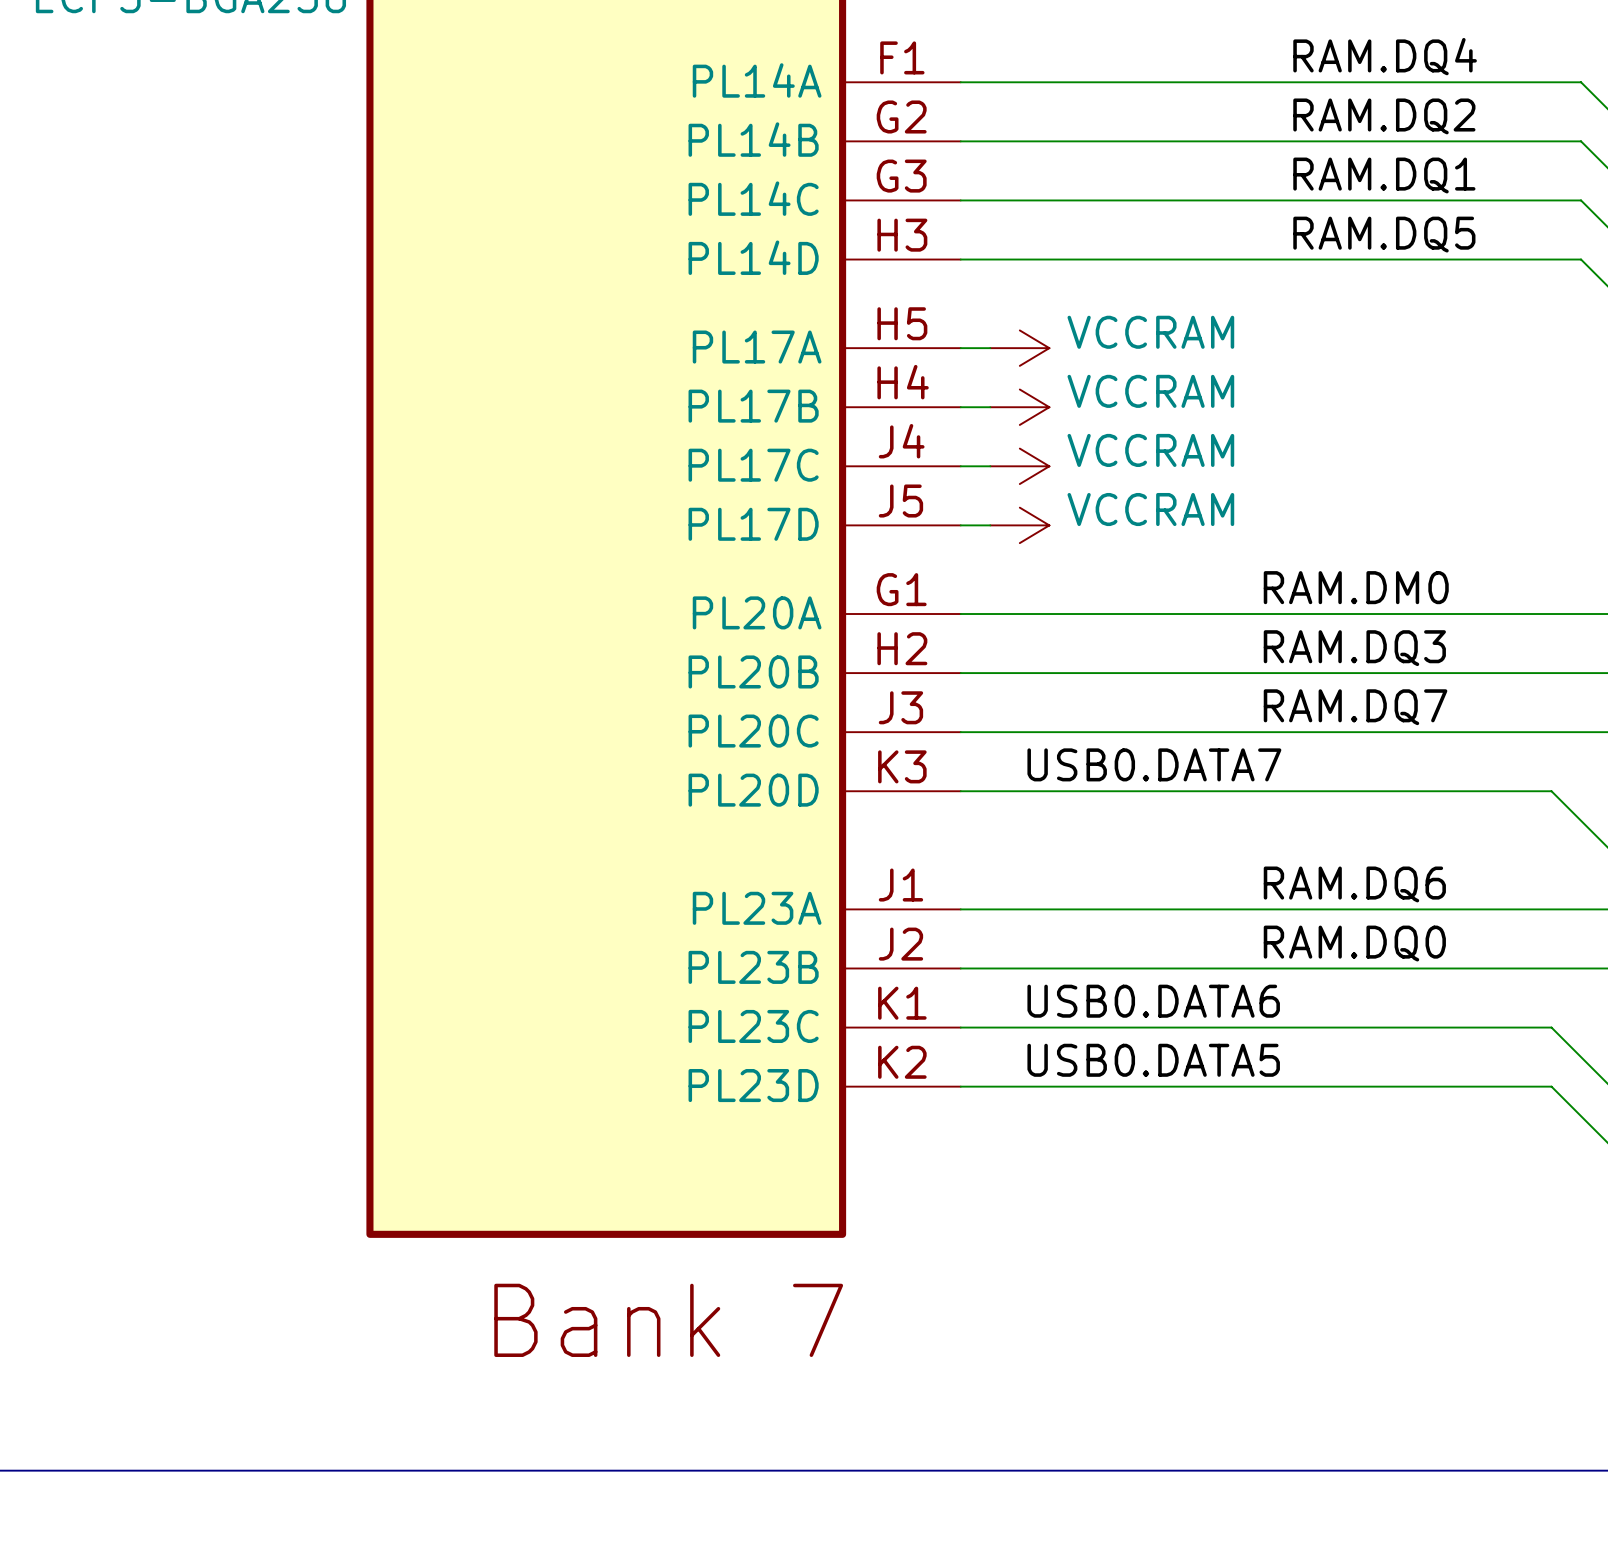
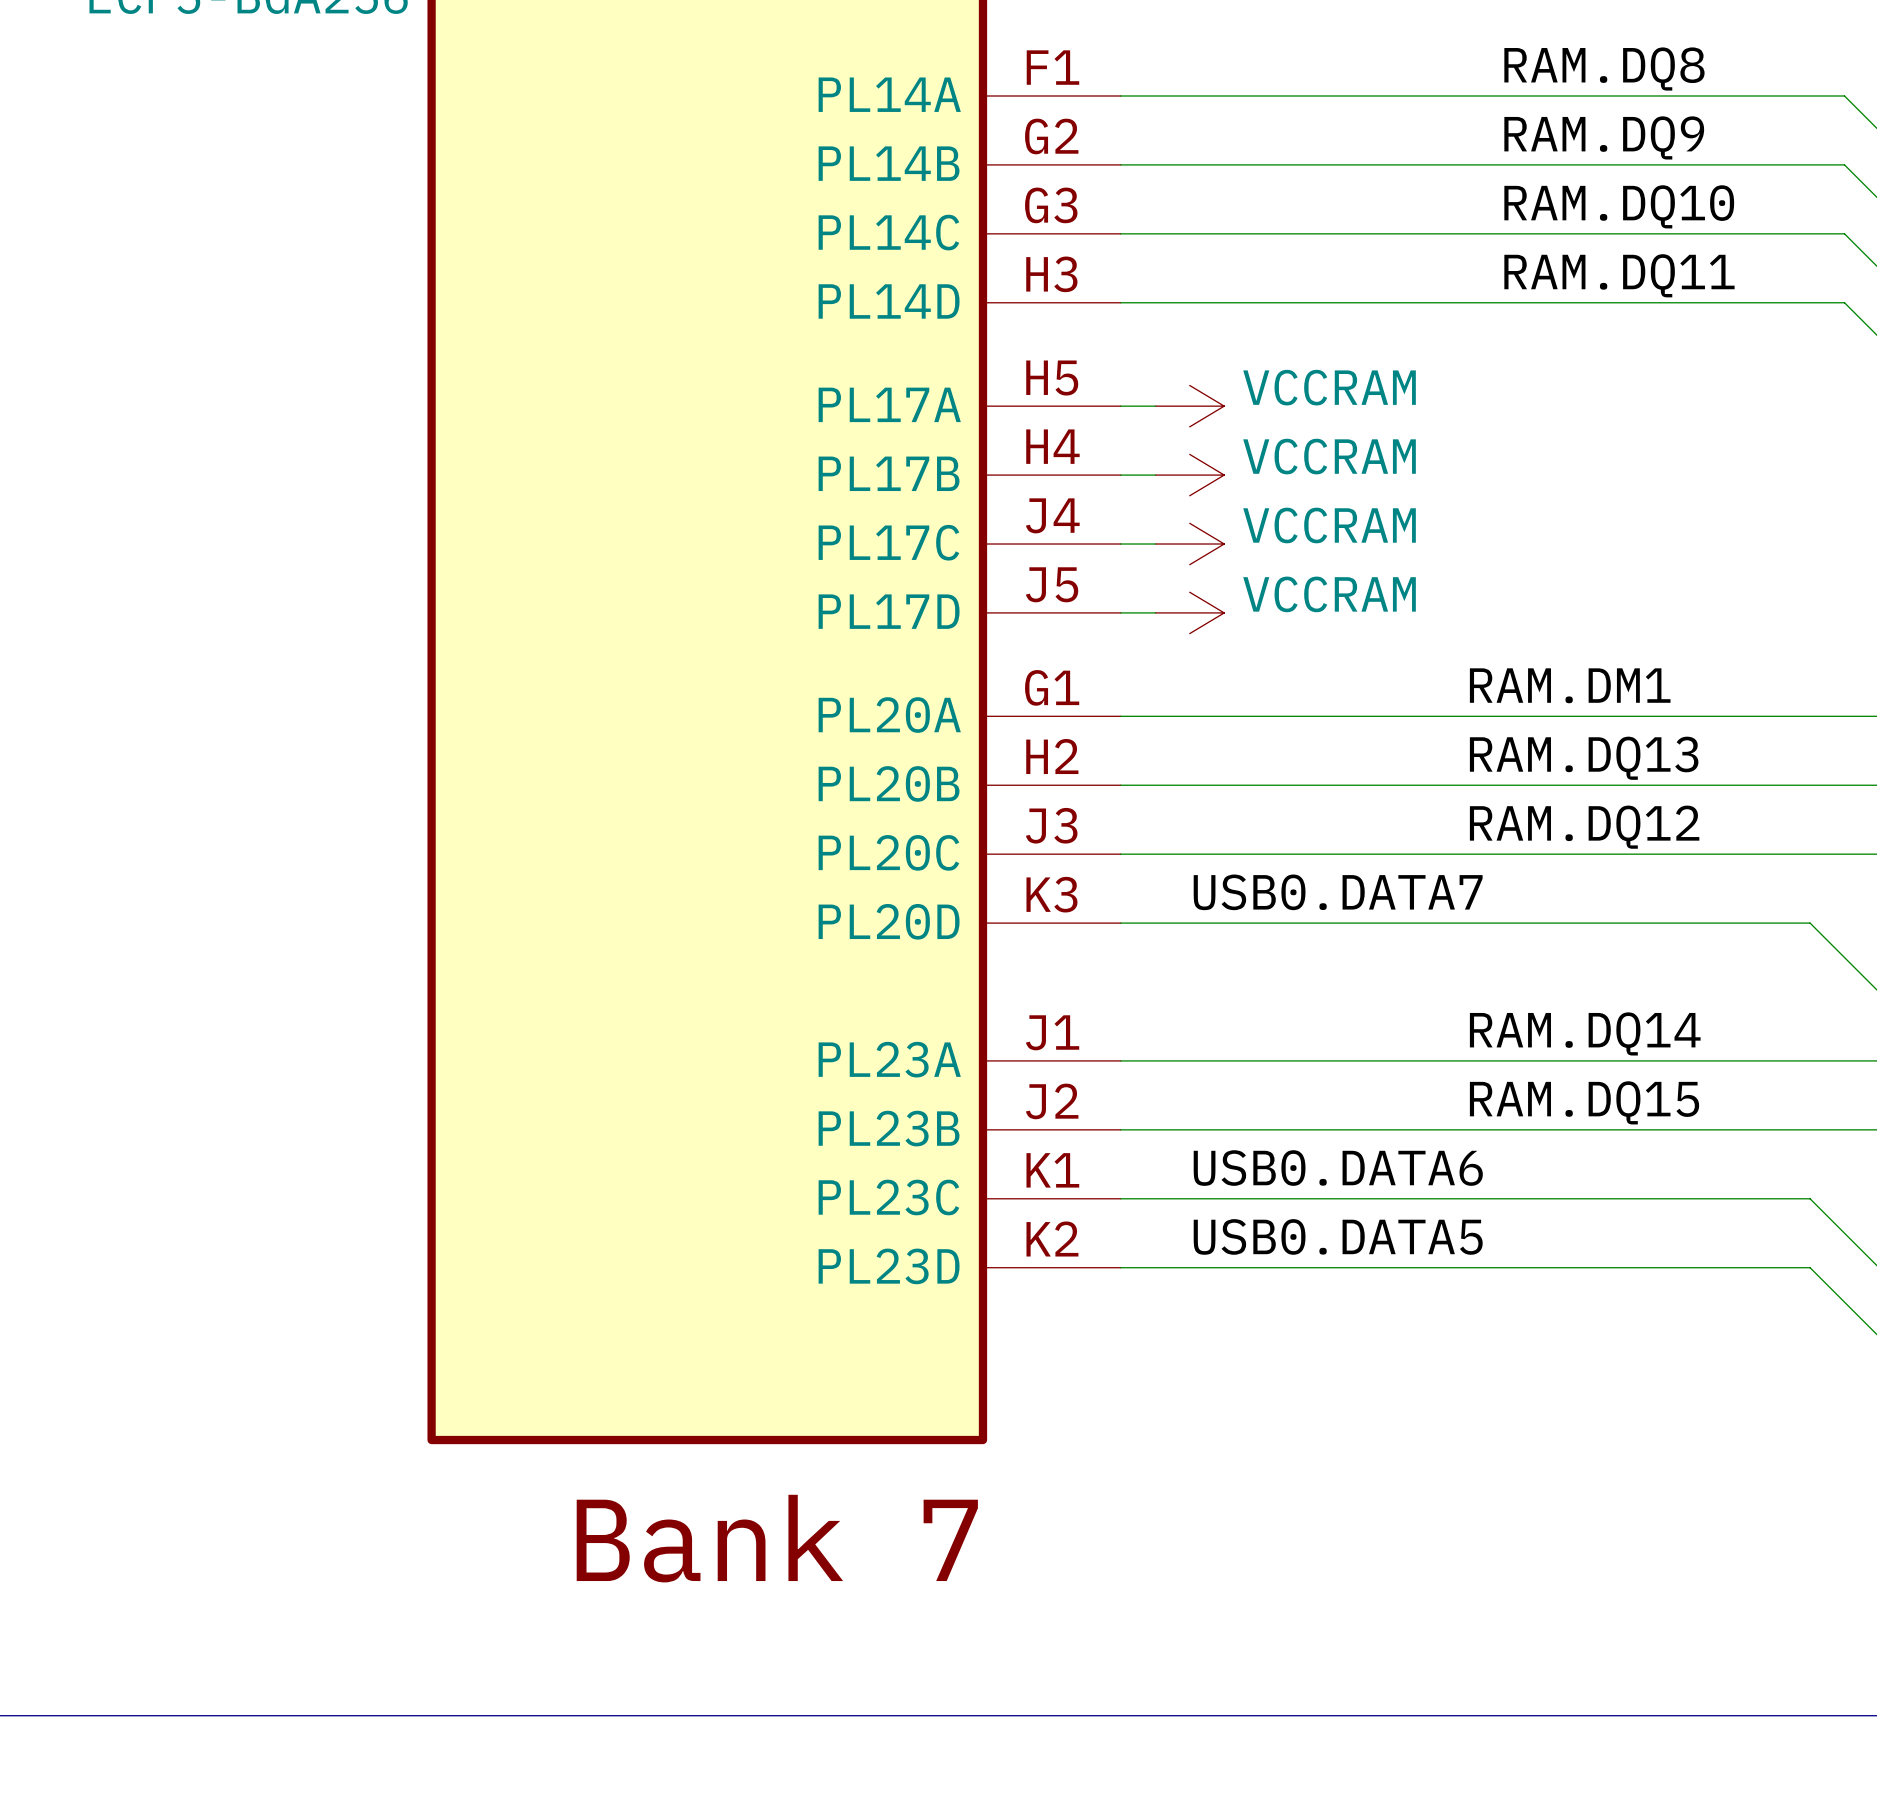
label: RAM.DQ4 (1385, 56) -> RAM.DQ8 (1604, 69)
label: RAM.DQ2 (1384, 116) -> RAM.DQ9 (1604, 137)
label: RAM.DQ1 (1384, 175) -> RAM.DQ10 (1619, 206)
label: RAM.DQ5 (1384, 234) -> RAM.DQ11 (1619, 275)
label: RAM.DM0 (1356, 587) -> RAM.DM1 (1570, 685)
label: RAM.DQ3 (1354, 648) -> RAM.DQ13 (1584, 758)
label: RAM.DQ7 (1355, 707) -> RAM.DQ12 (1584, 827)
label: RAM.DQ6 (1354, 884) -> RAM.DQ14 (1585, 1033)
label: RAM.DQ0 (1354, 943) -> RAM.DQ15 (1584, 1102)

